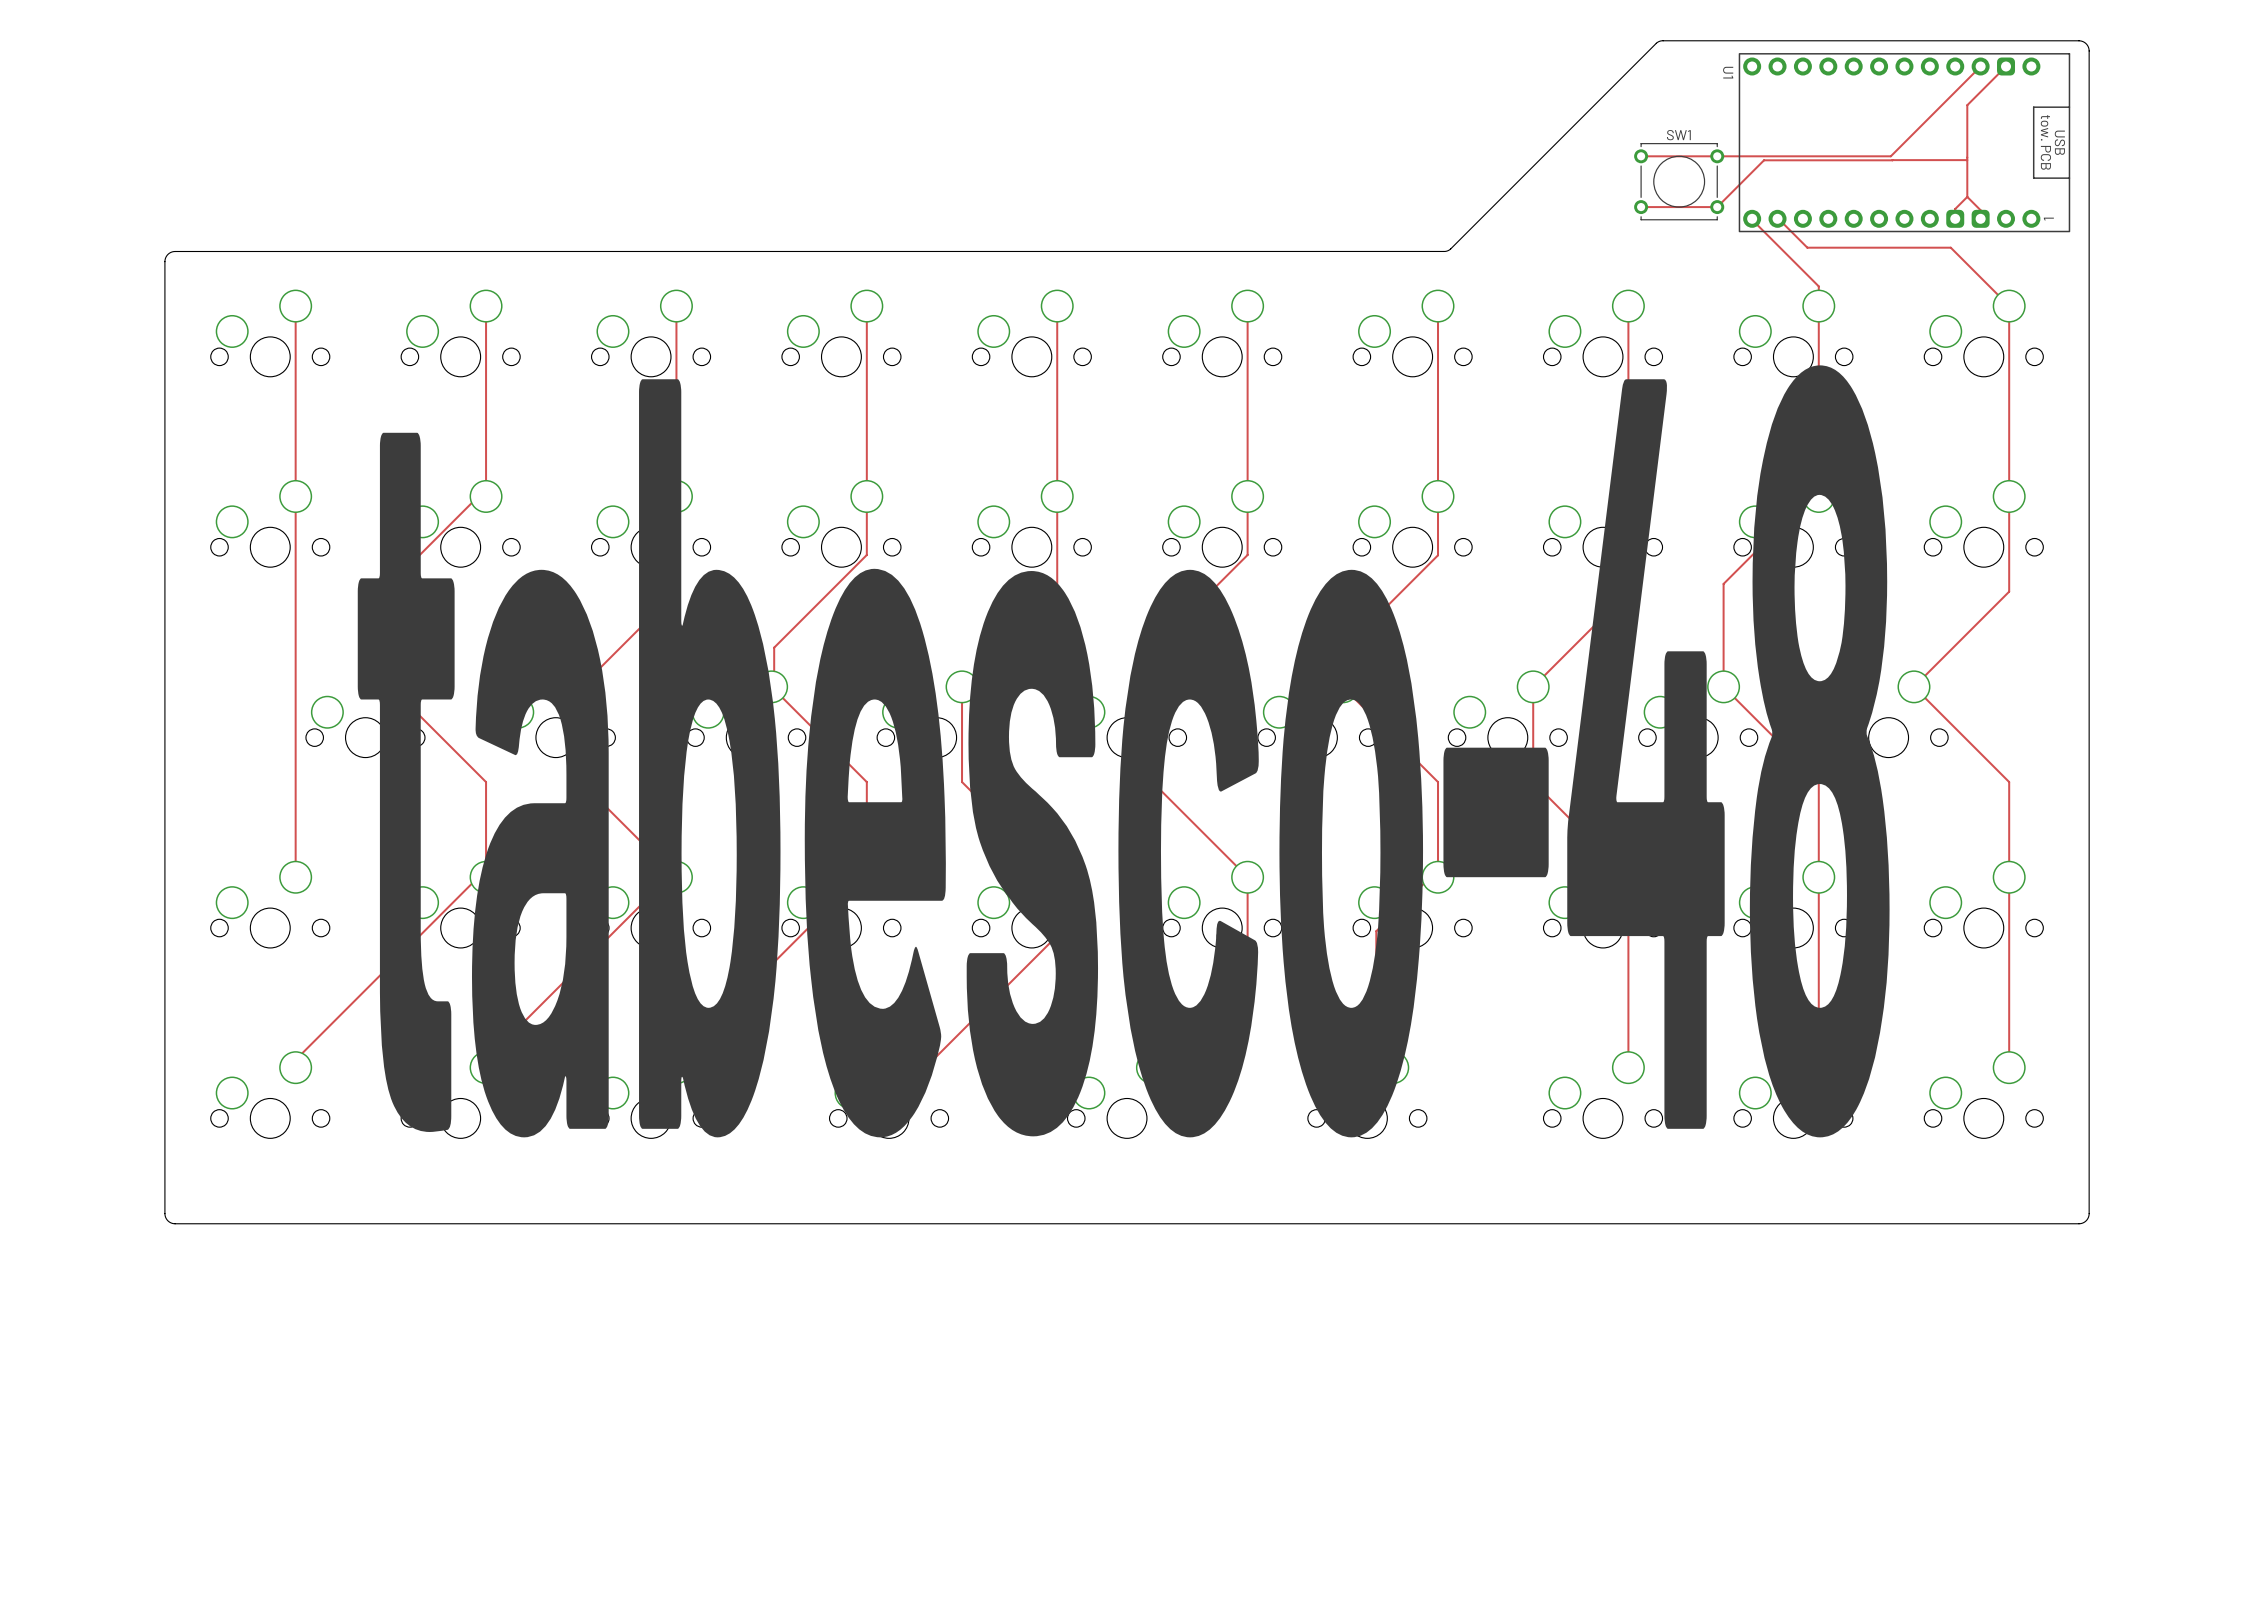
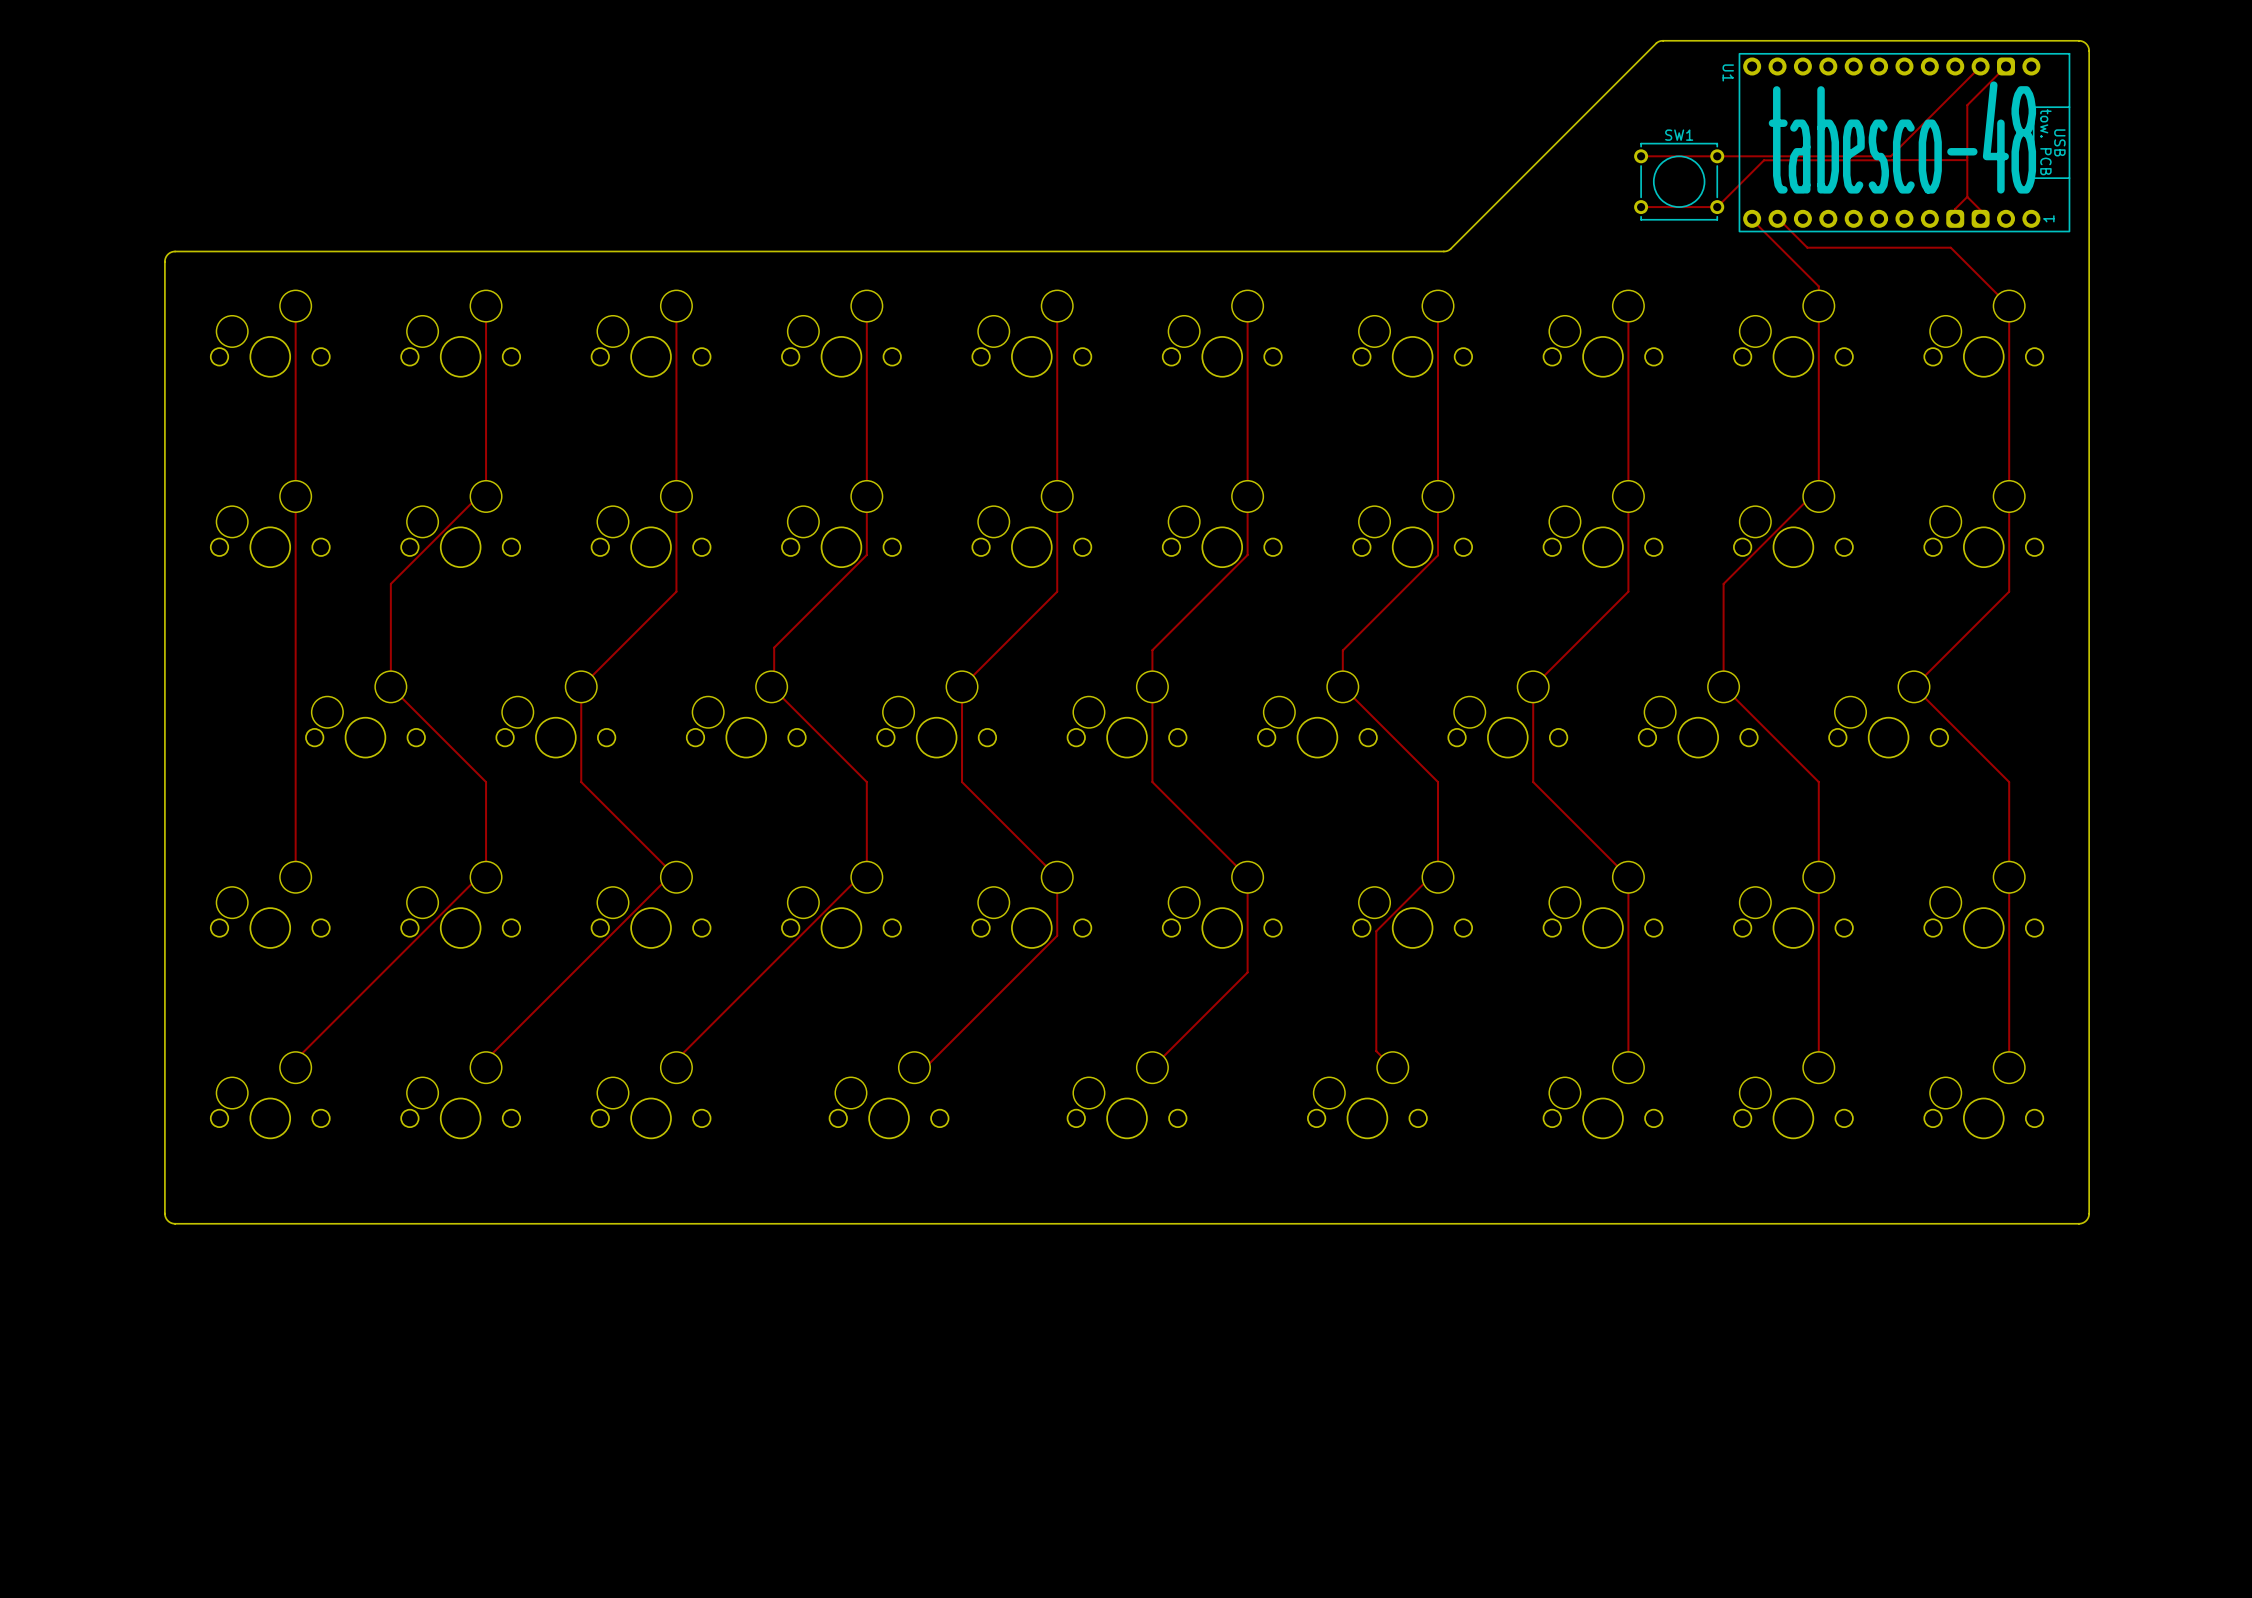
text: none -> tabesco-48 (1902, 137)
text: tabesco-48 (1123, 751) -> none

